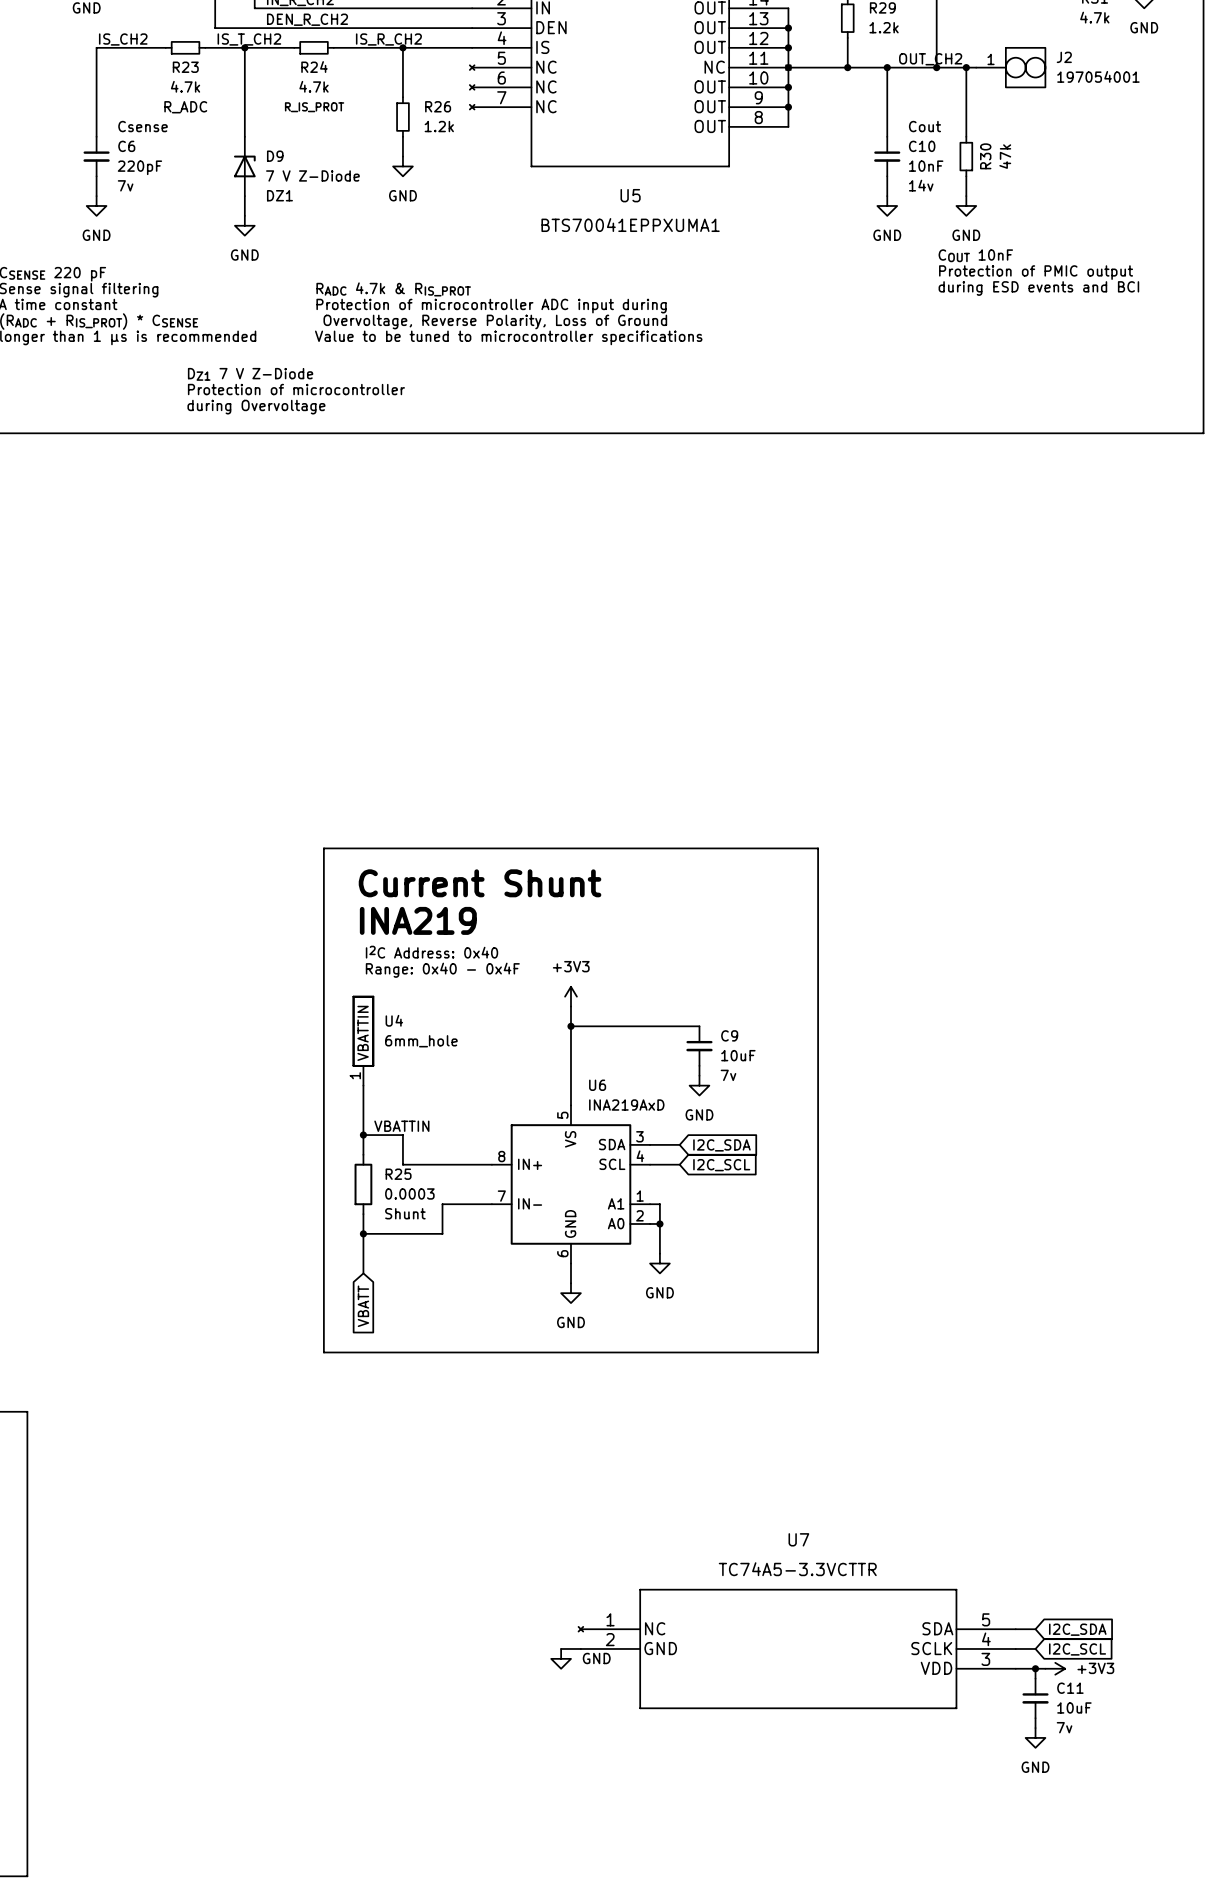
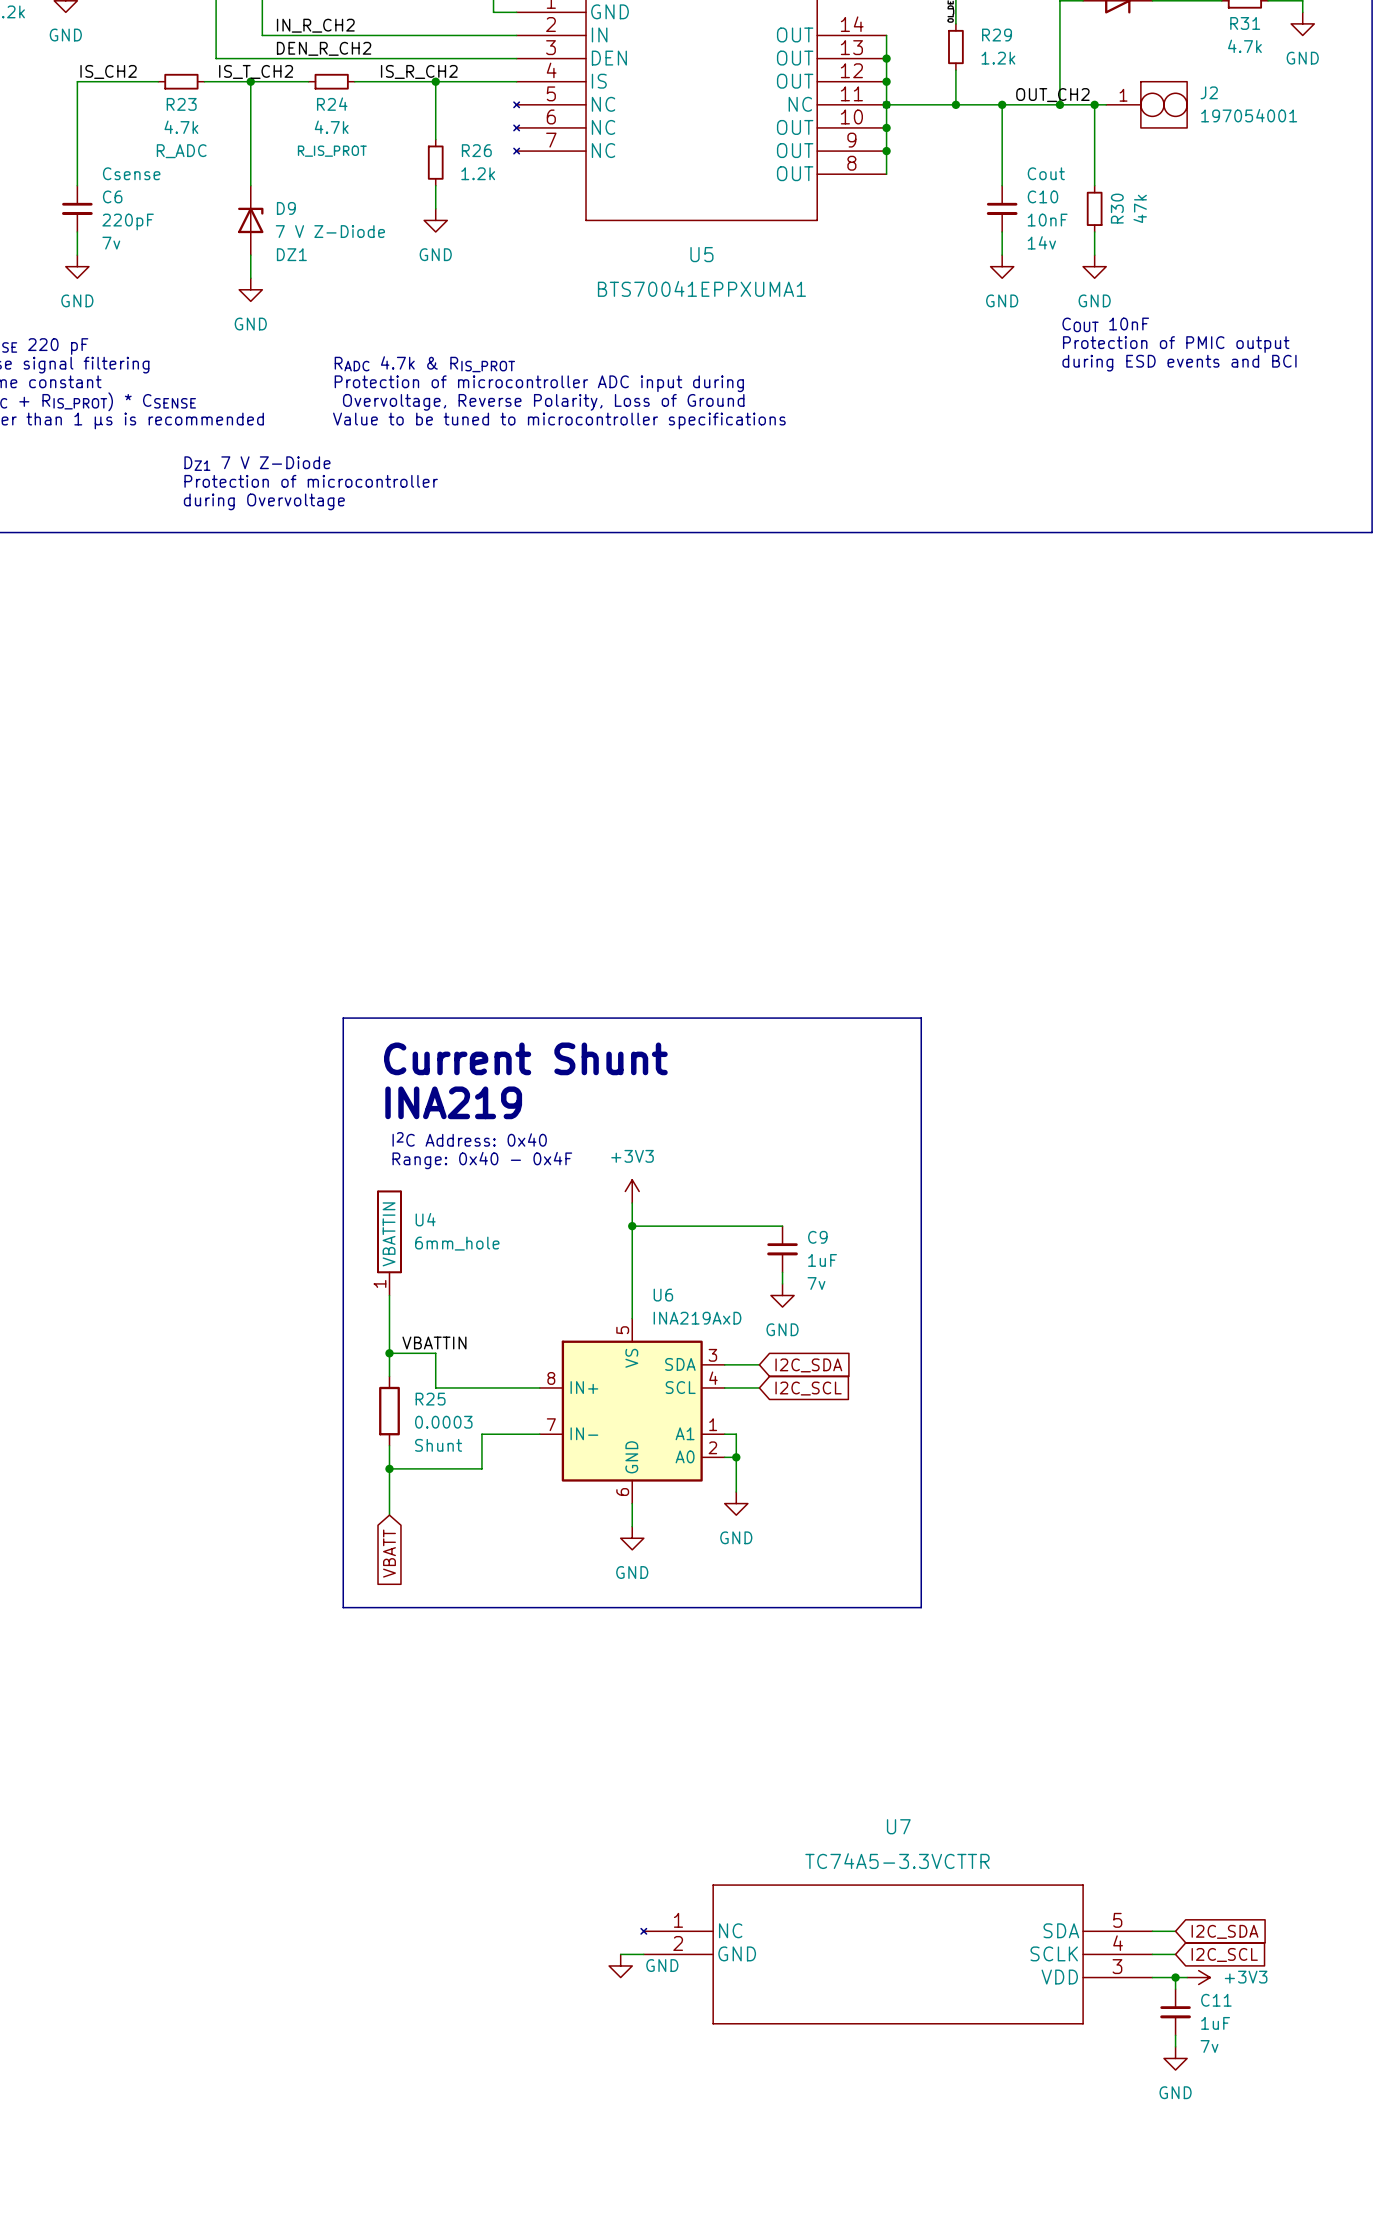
C9 value: 10uF (738, 1055) -> 1uF (822, 1260)
C11 value: 10uF (1074, 1707) -> 1uF (1215, 2023)

